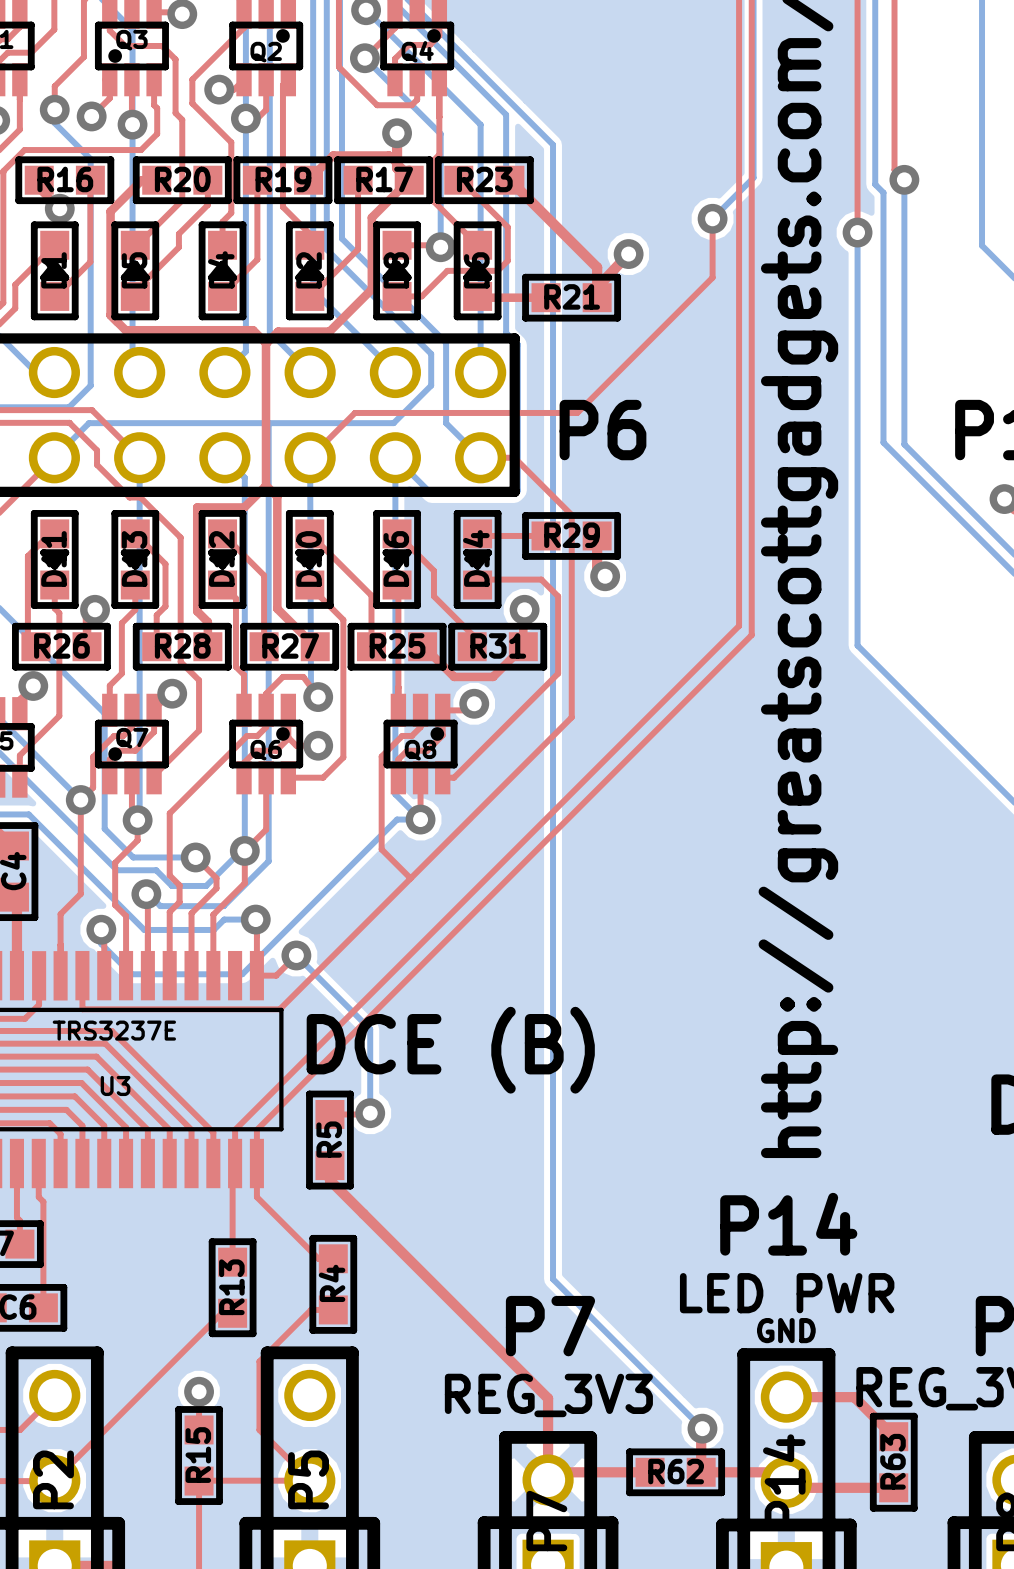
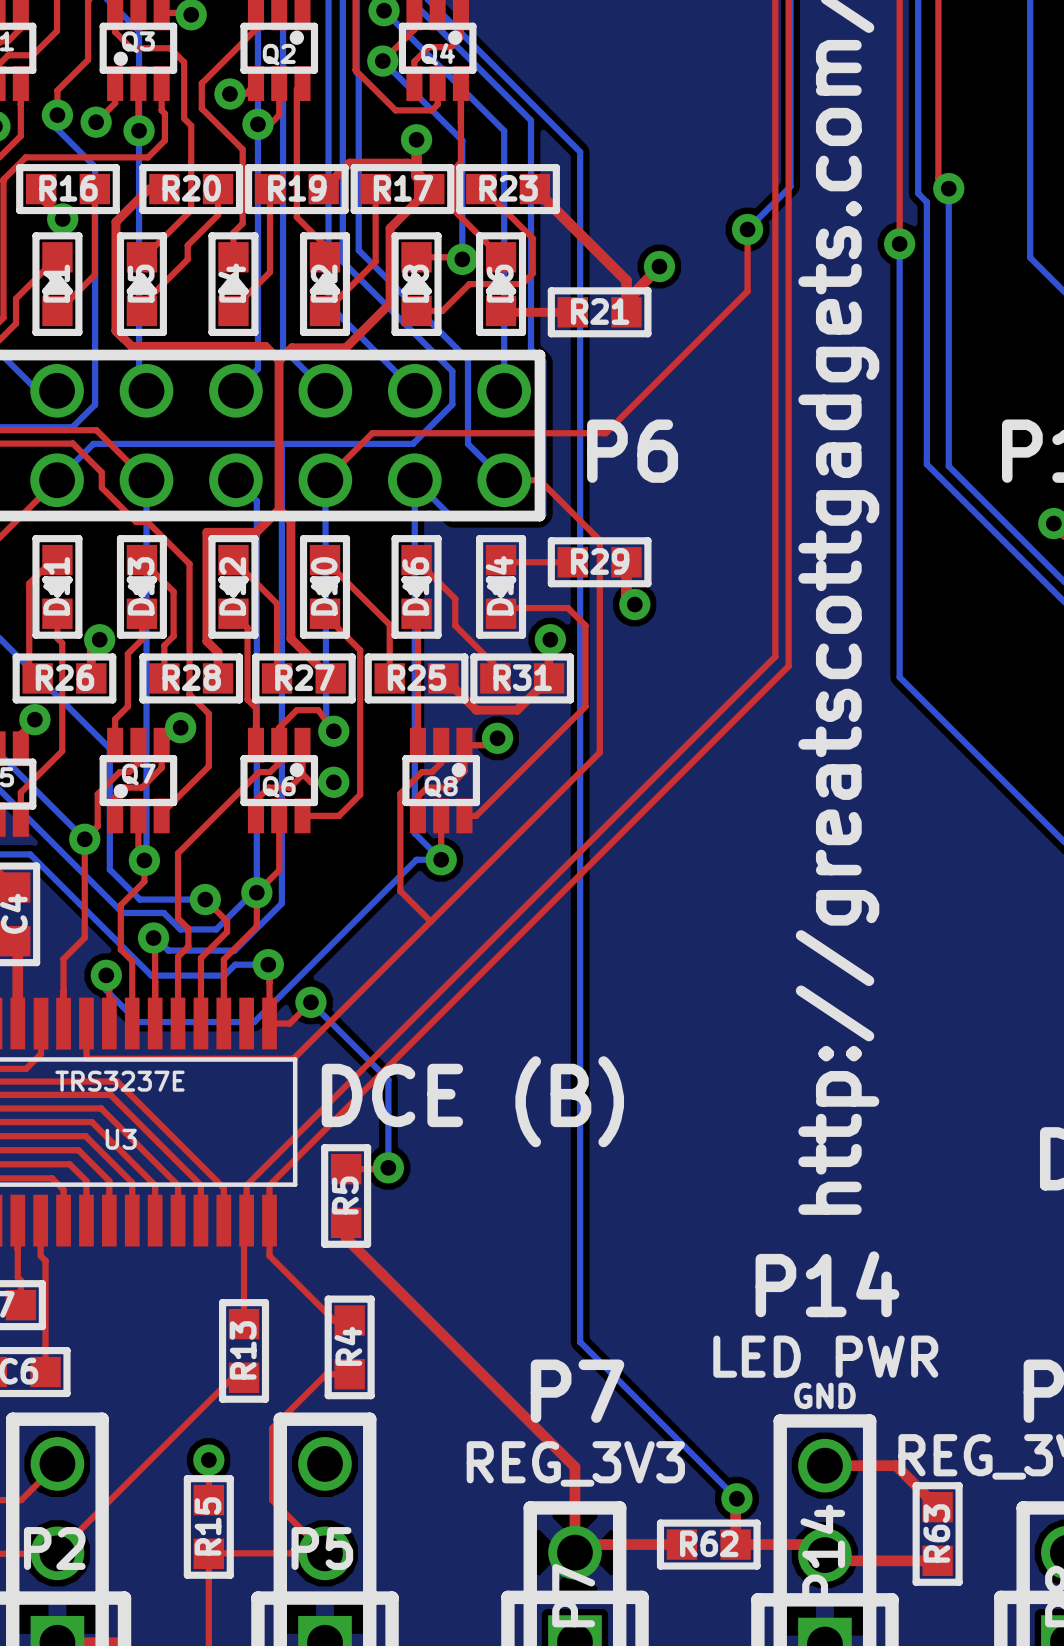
P2 name rotation: 0° (53, 1479) -> 90° clockwise (54, 1548)
P5 name rotation: 0° (308, 1479) -> 90° clockwise (322, 1548)

